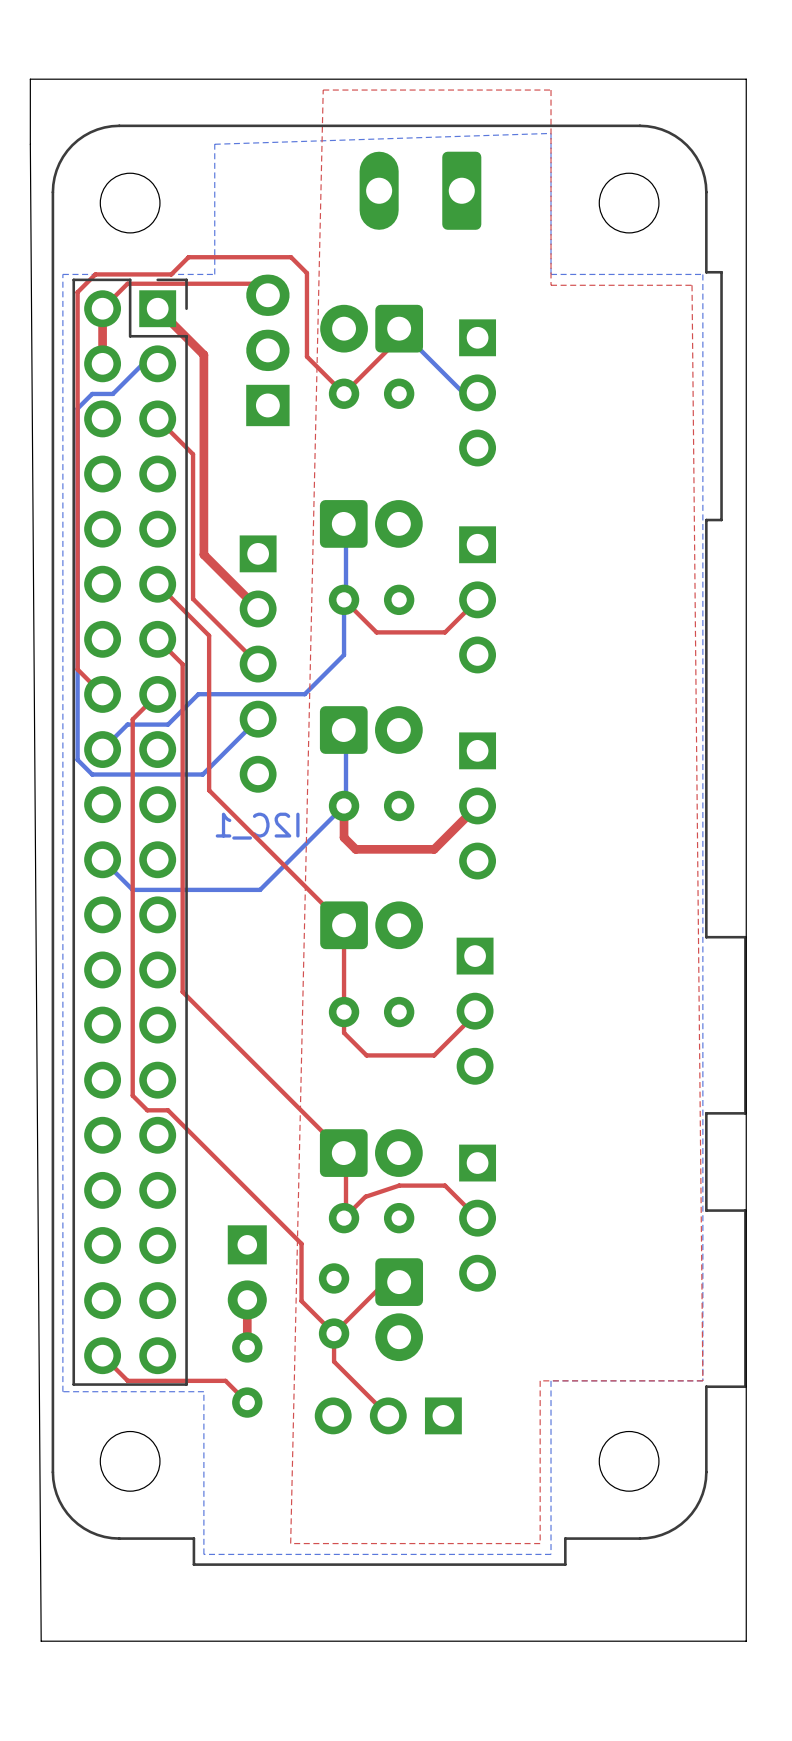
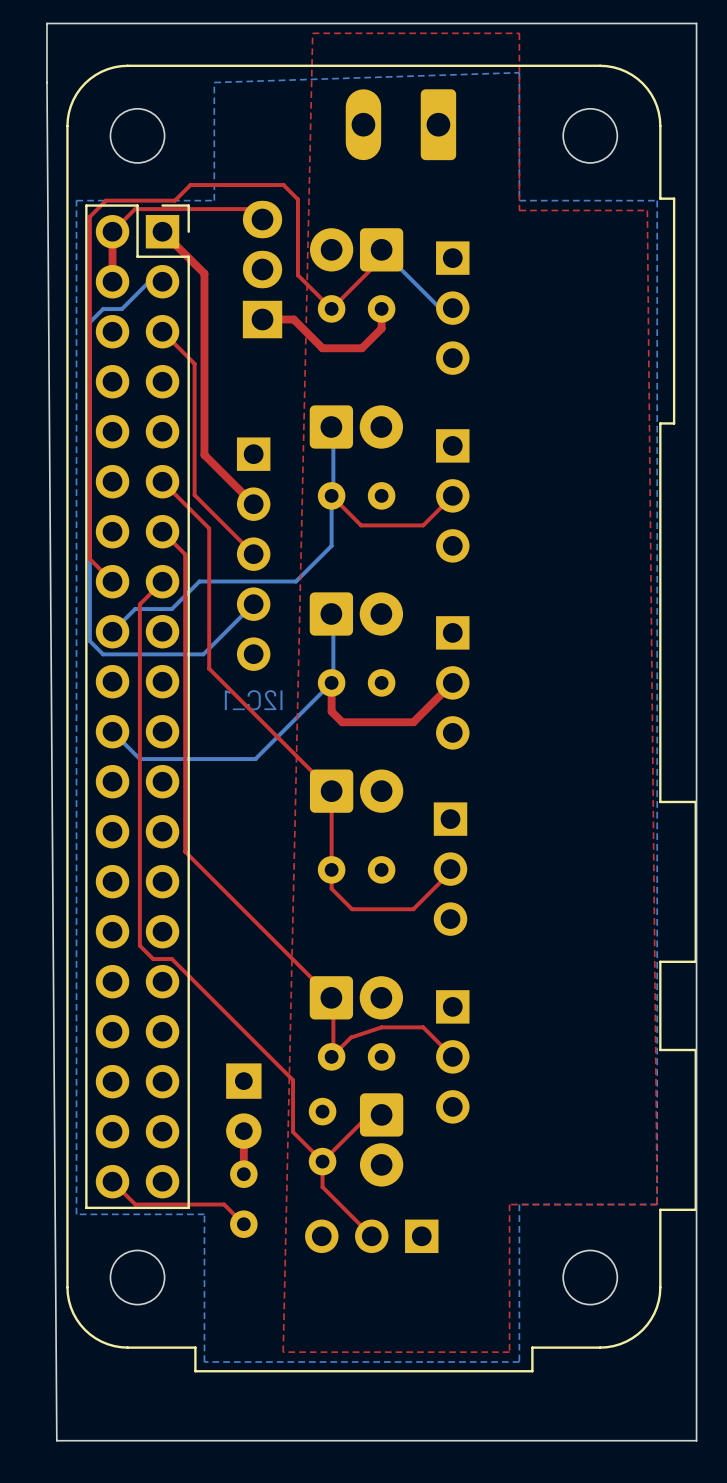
top track: none -> (381, 308) (381, 328) (361, 348) (322, 348) (293, 319) (262, 319)

